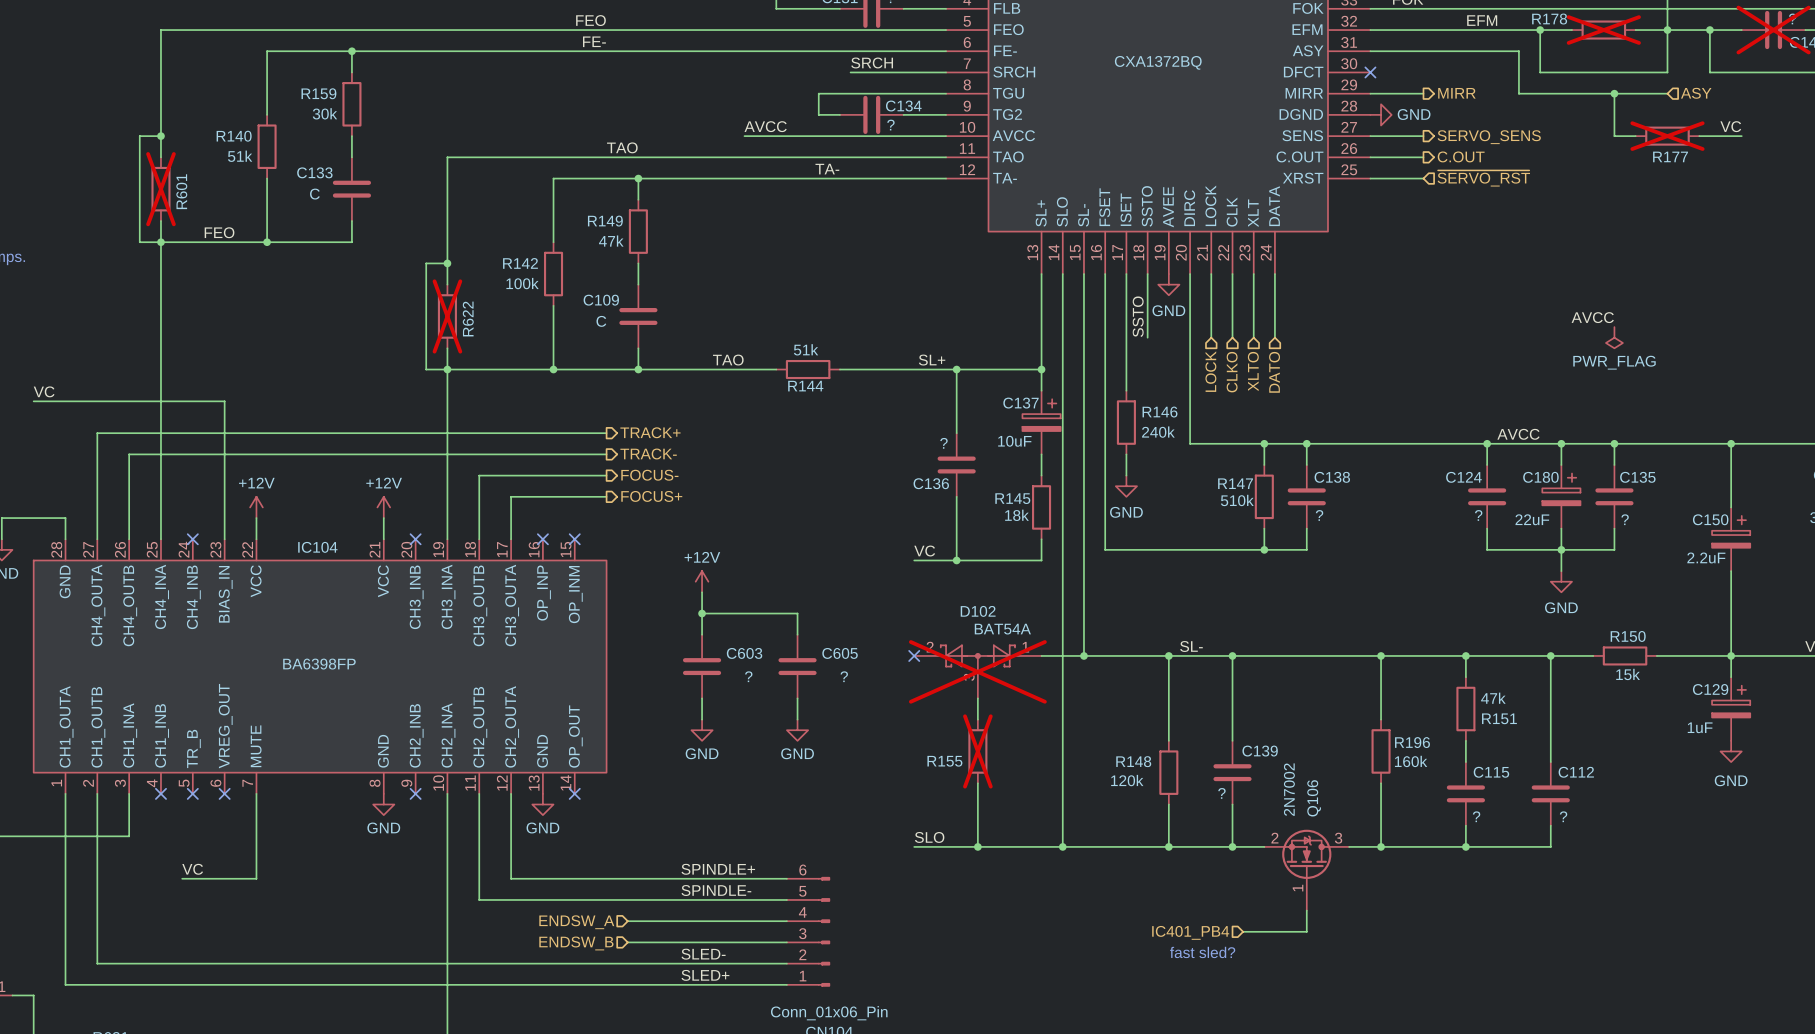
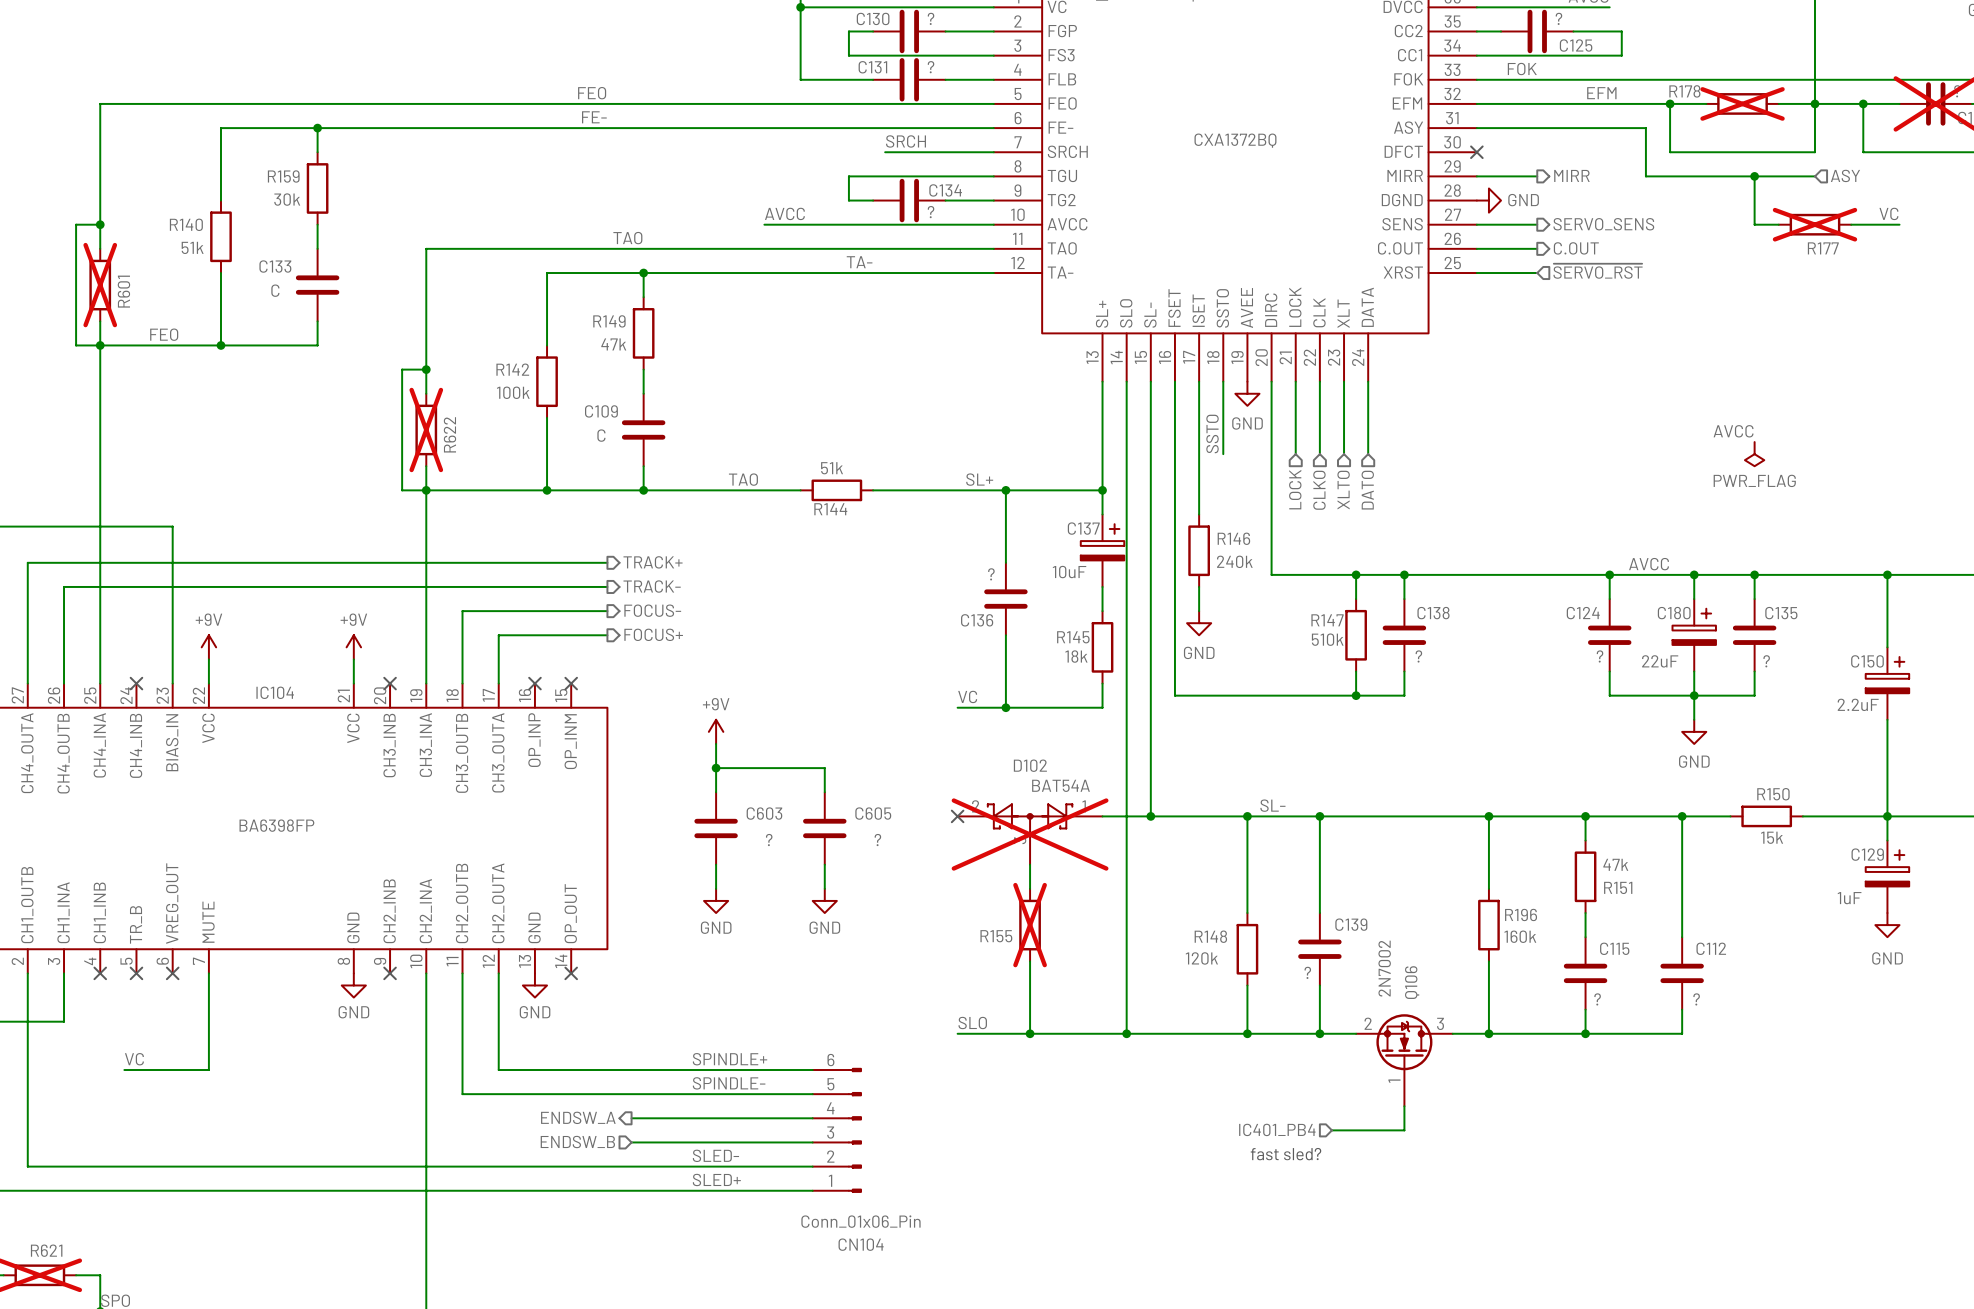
power symbol: +12V (256, 507) -> +9V (208, 647)
power symbol: +12V (383, 507) -> +9V (353, 647)
power symbol: +12V (702, 581) -> +9V (716, 731)
hierarchical label shape: input (576, 922) -> output (578, 1117)

